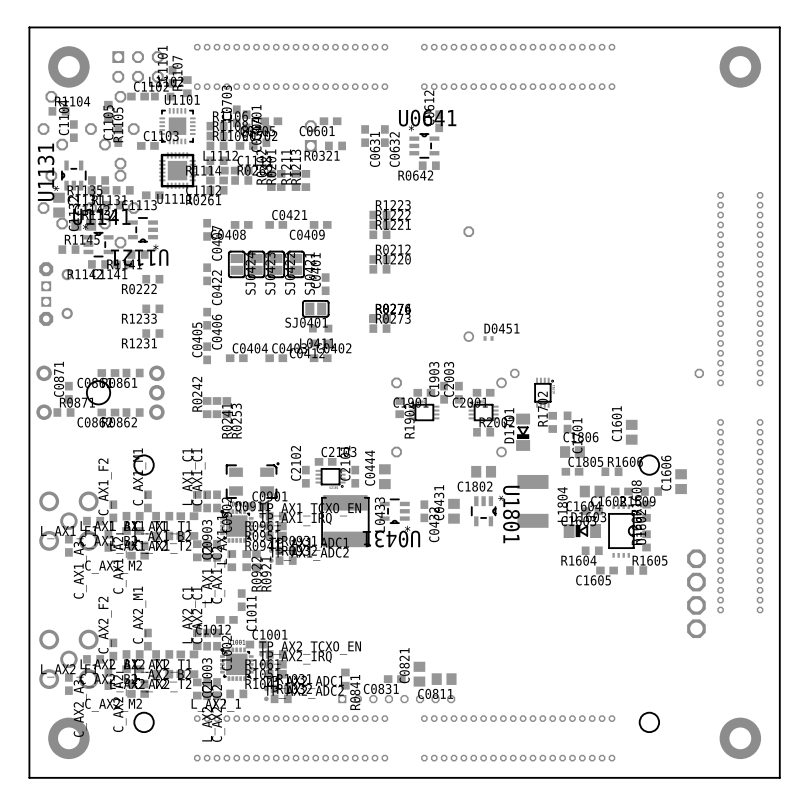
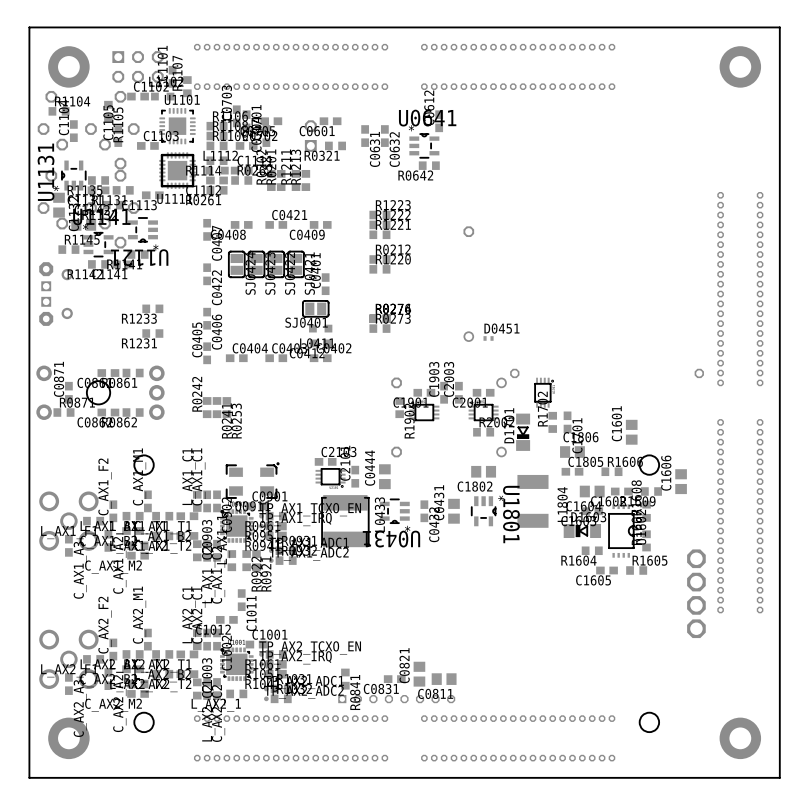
R0222: (152, 279) -> none
C2102: (305, 476) -> none

